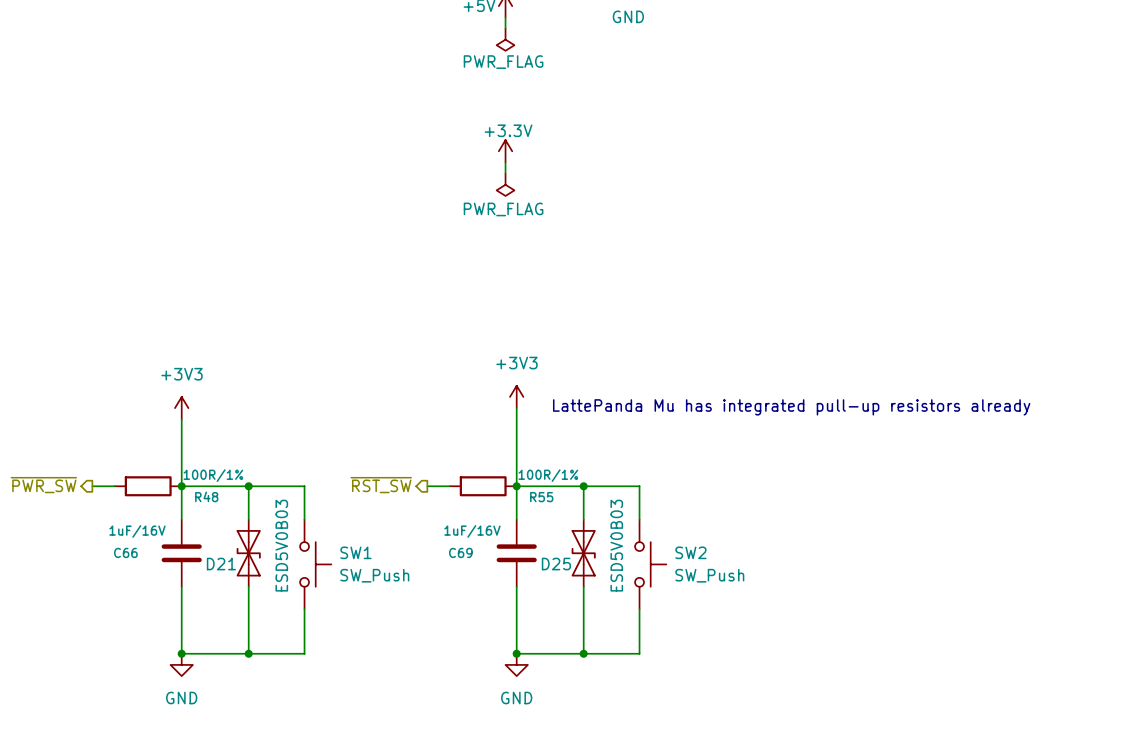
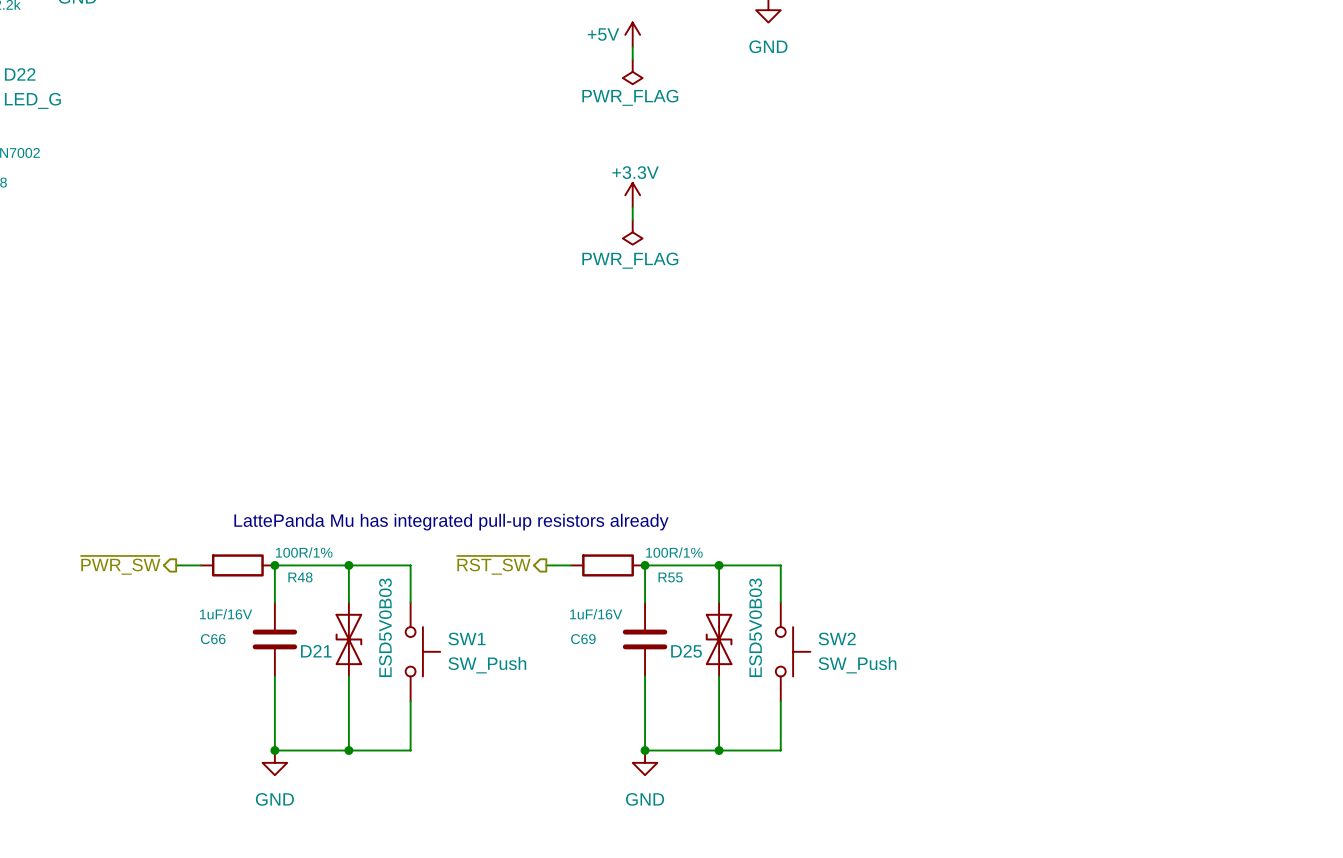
power symbol: +3V3 (516, 396) -> none
text: LattePanda Mu has integrated pull-up resistors already (791, 407) -> none
power symbol: +3V3 (181, 408) -> none
wire: (516, 408) (516, 486) -> none
wire: (181, 419) (181, 486) -> none
text: none -> LattePanda Mu has integrated pull-up resistors already (451, 522)

